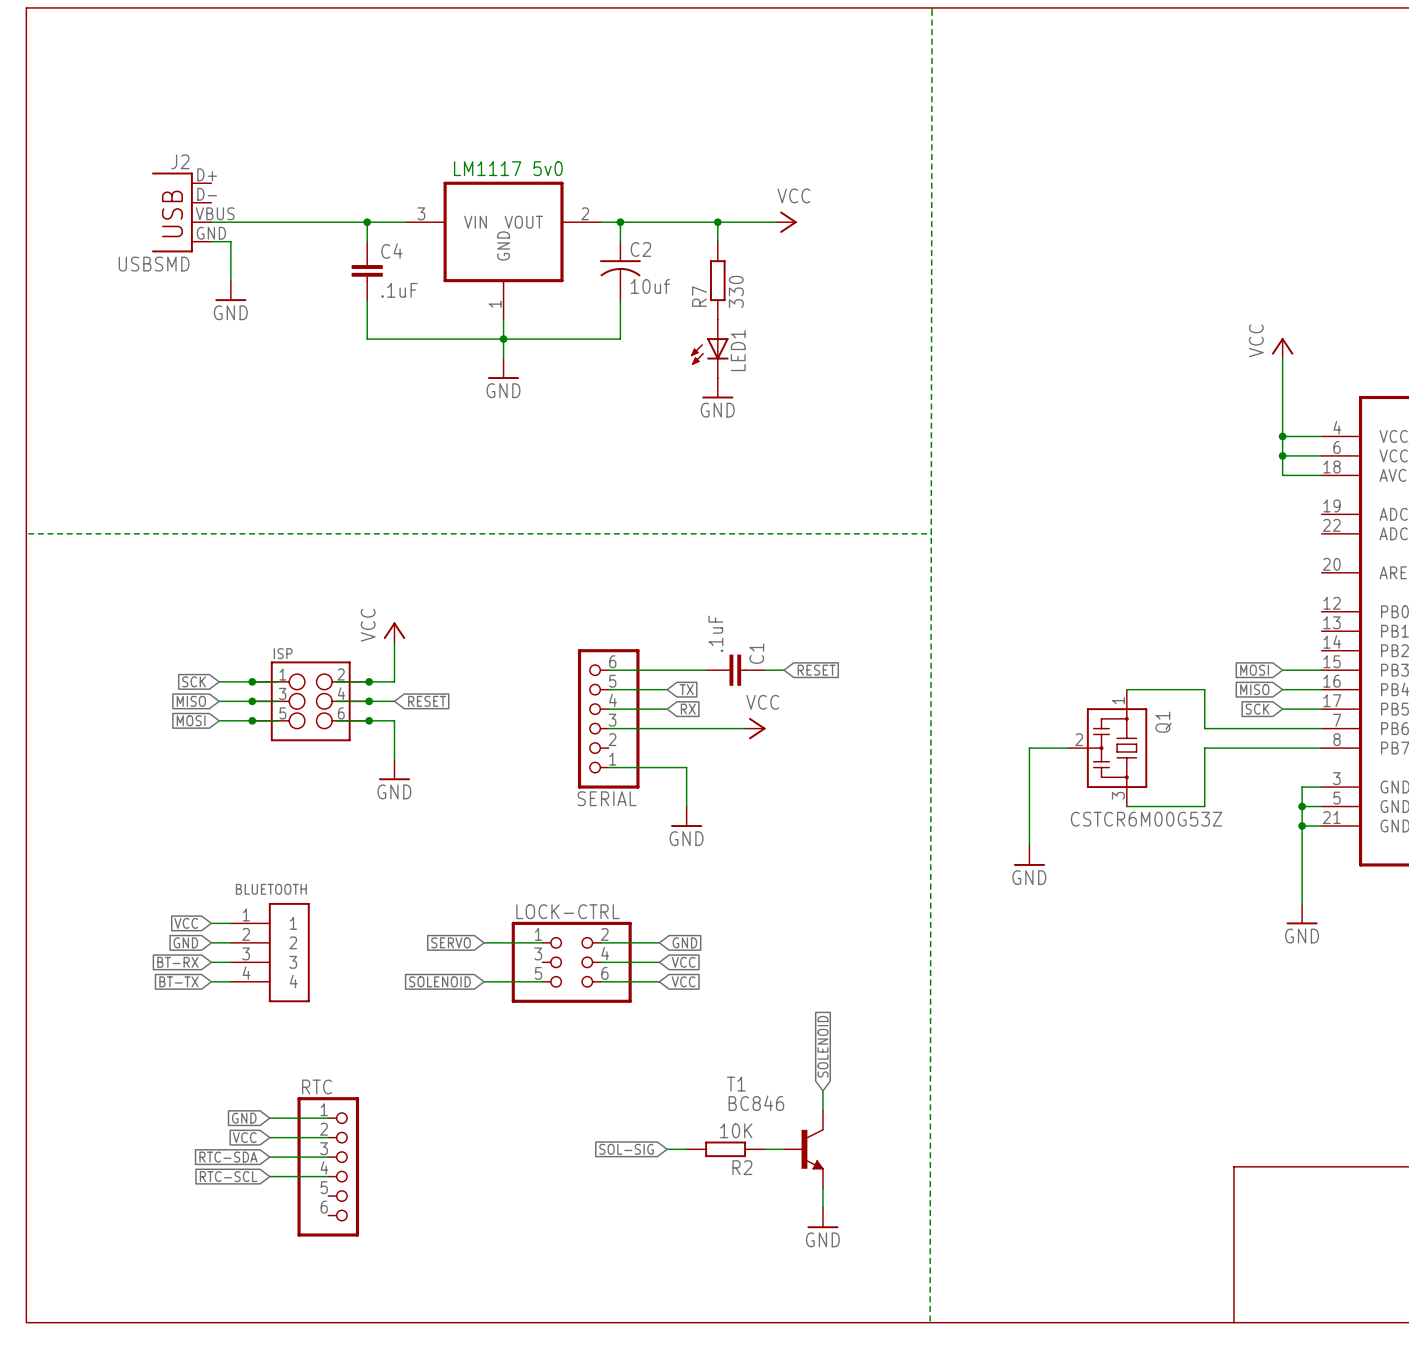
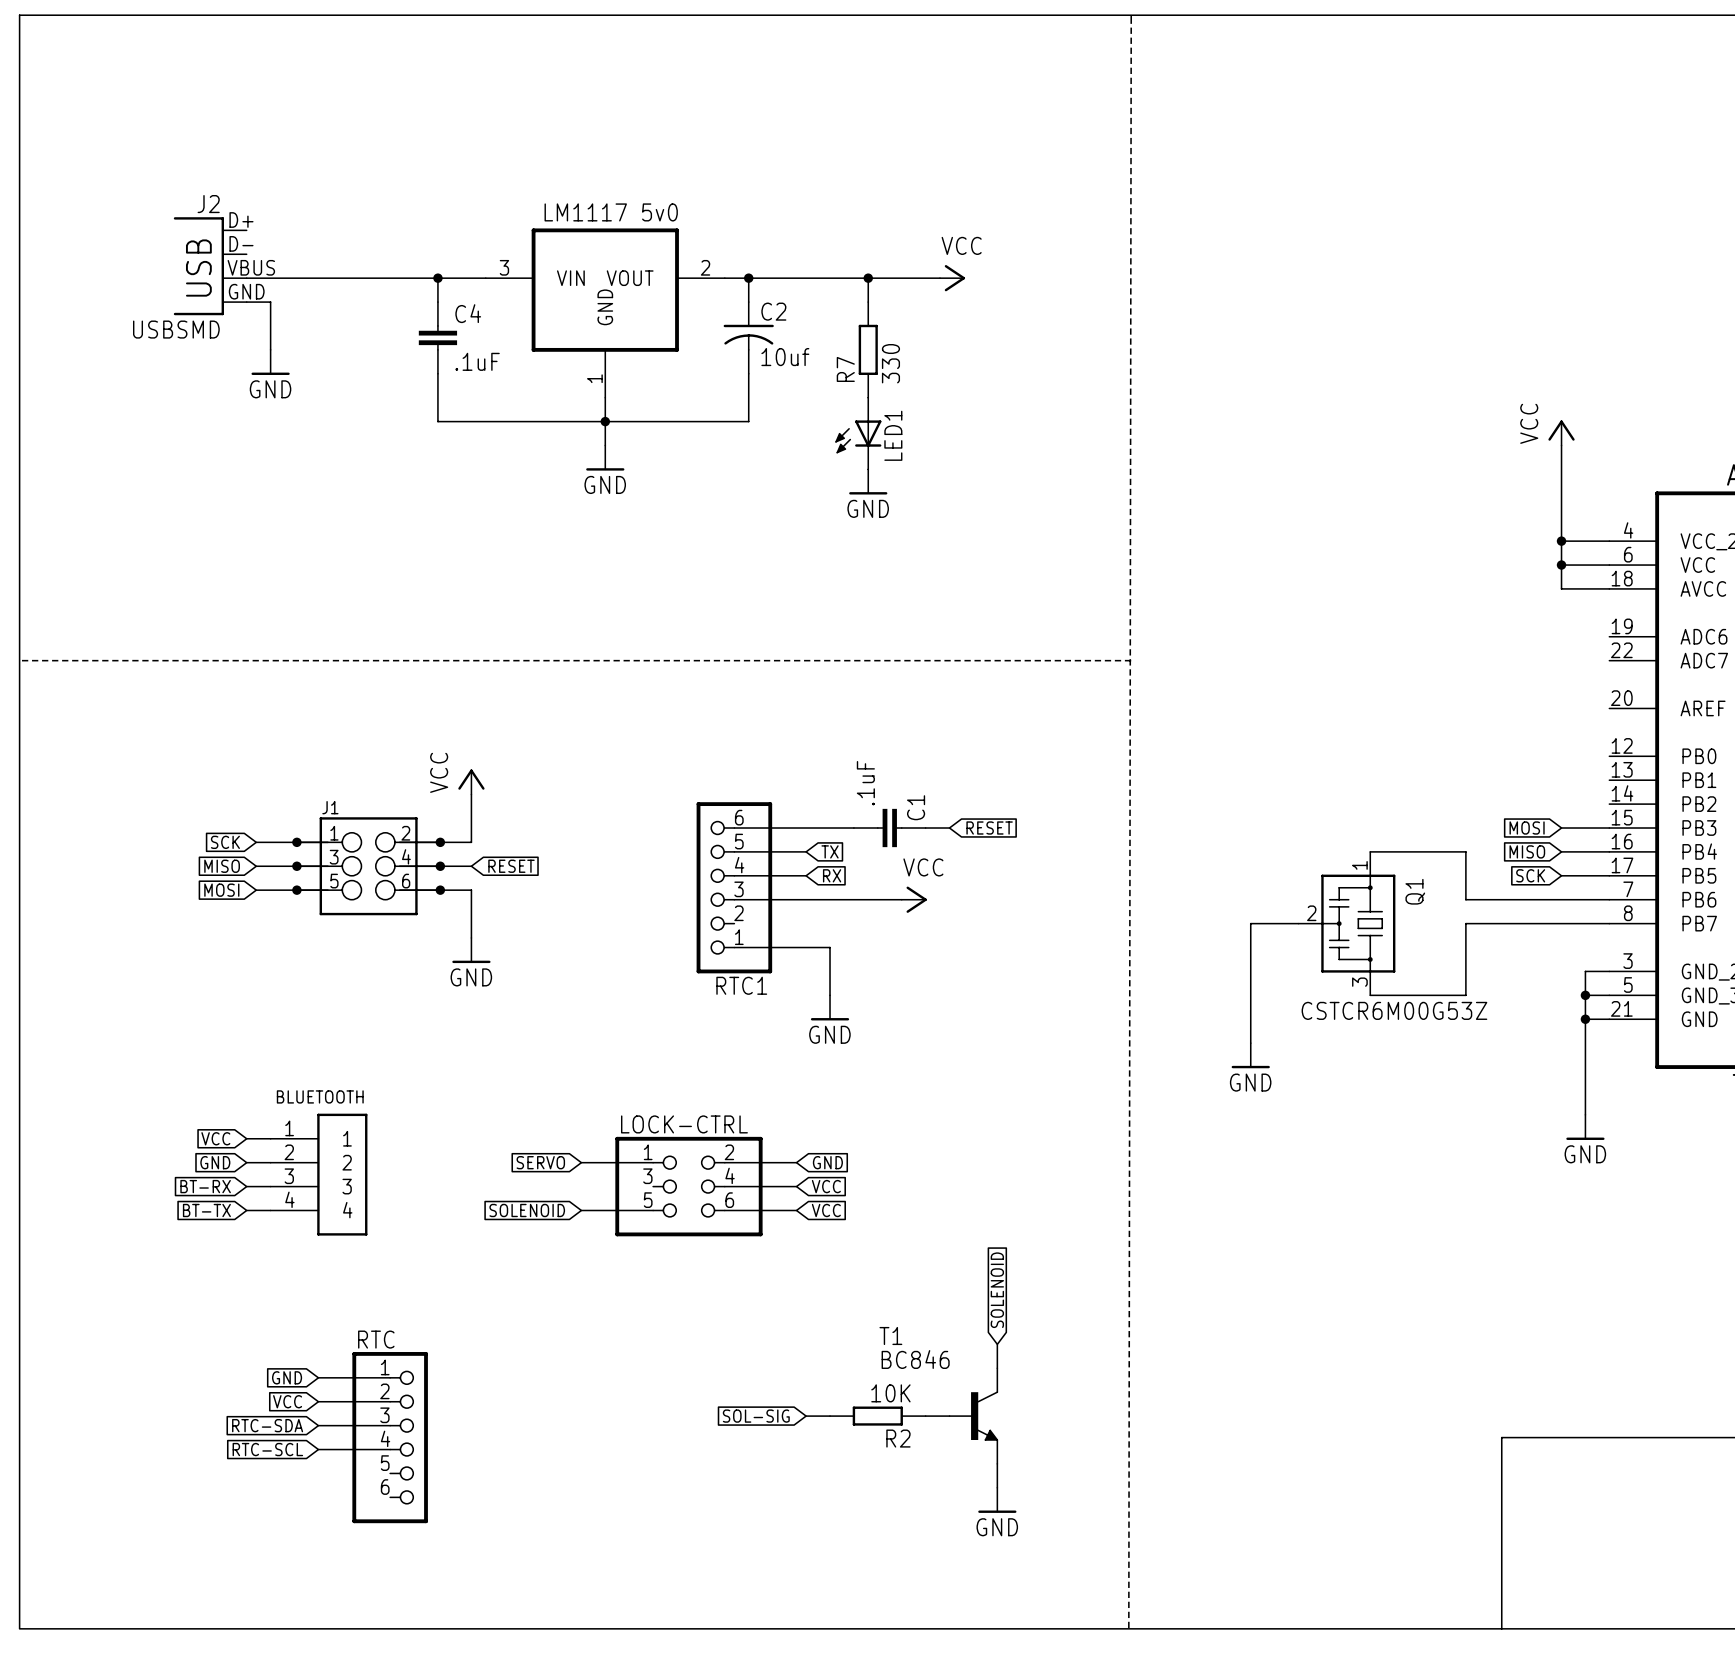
ISP name: ISP (283, 653) -> J1 (330, 807)
SERIAL name: SERIAL (607, 798) -> RTC1 (741, 985)

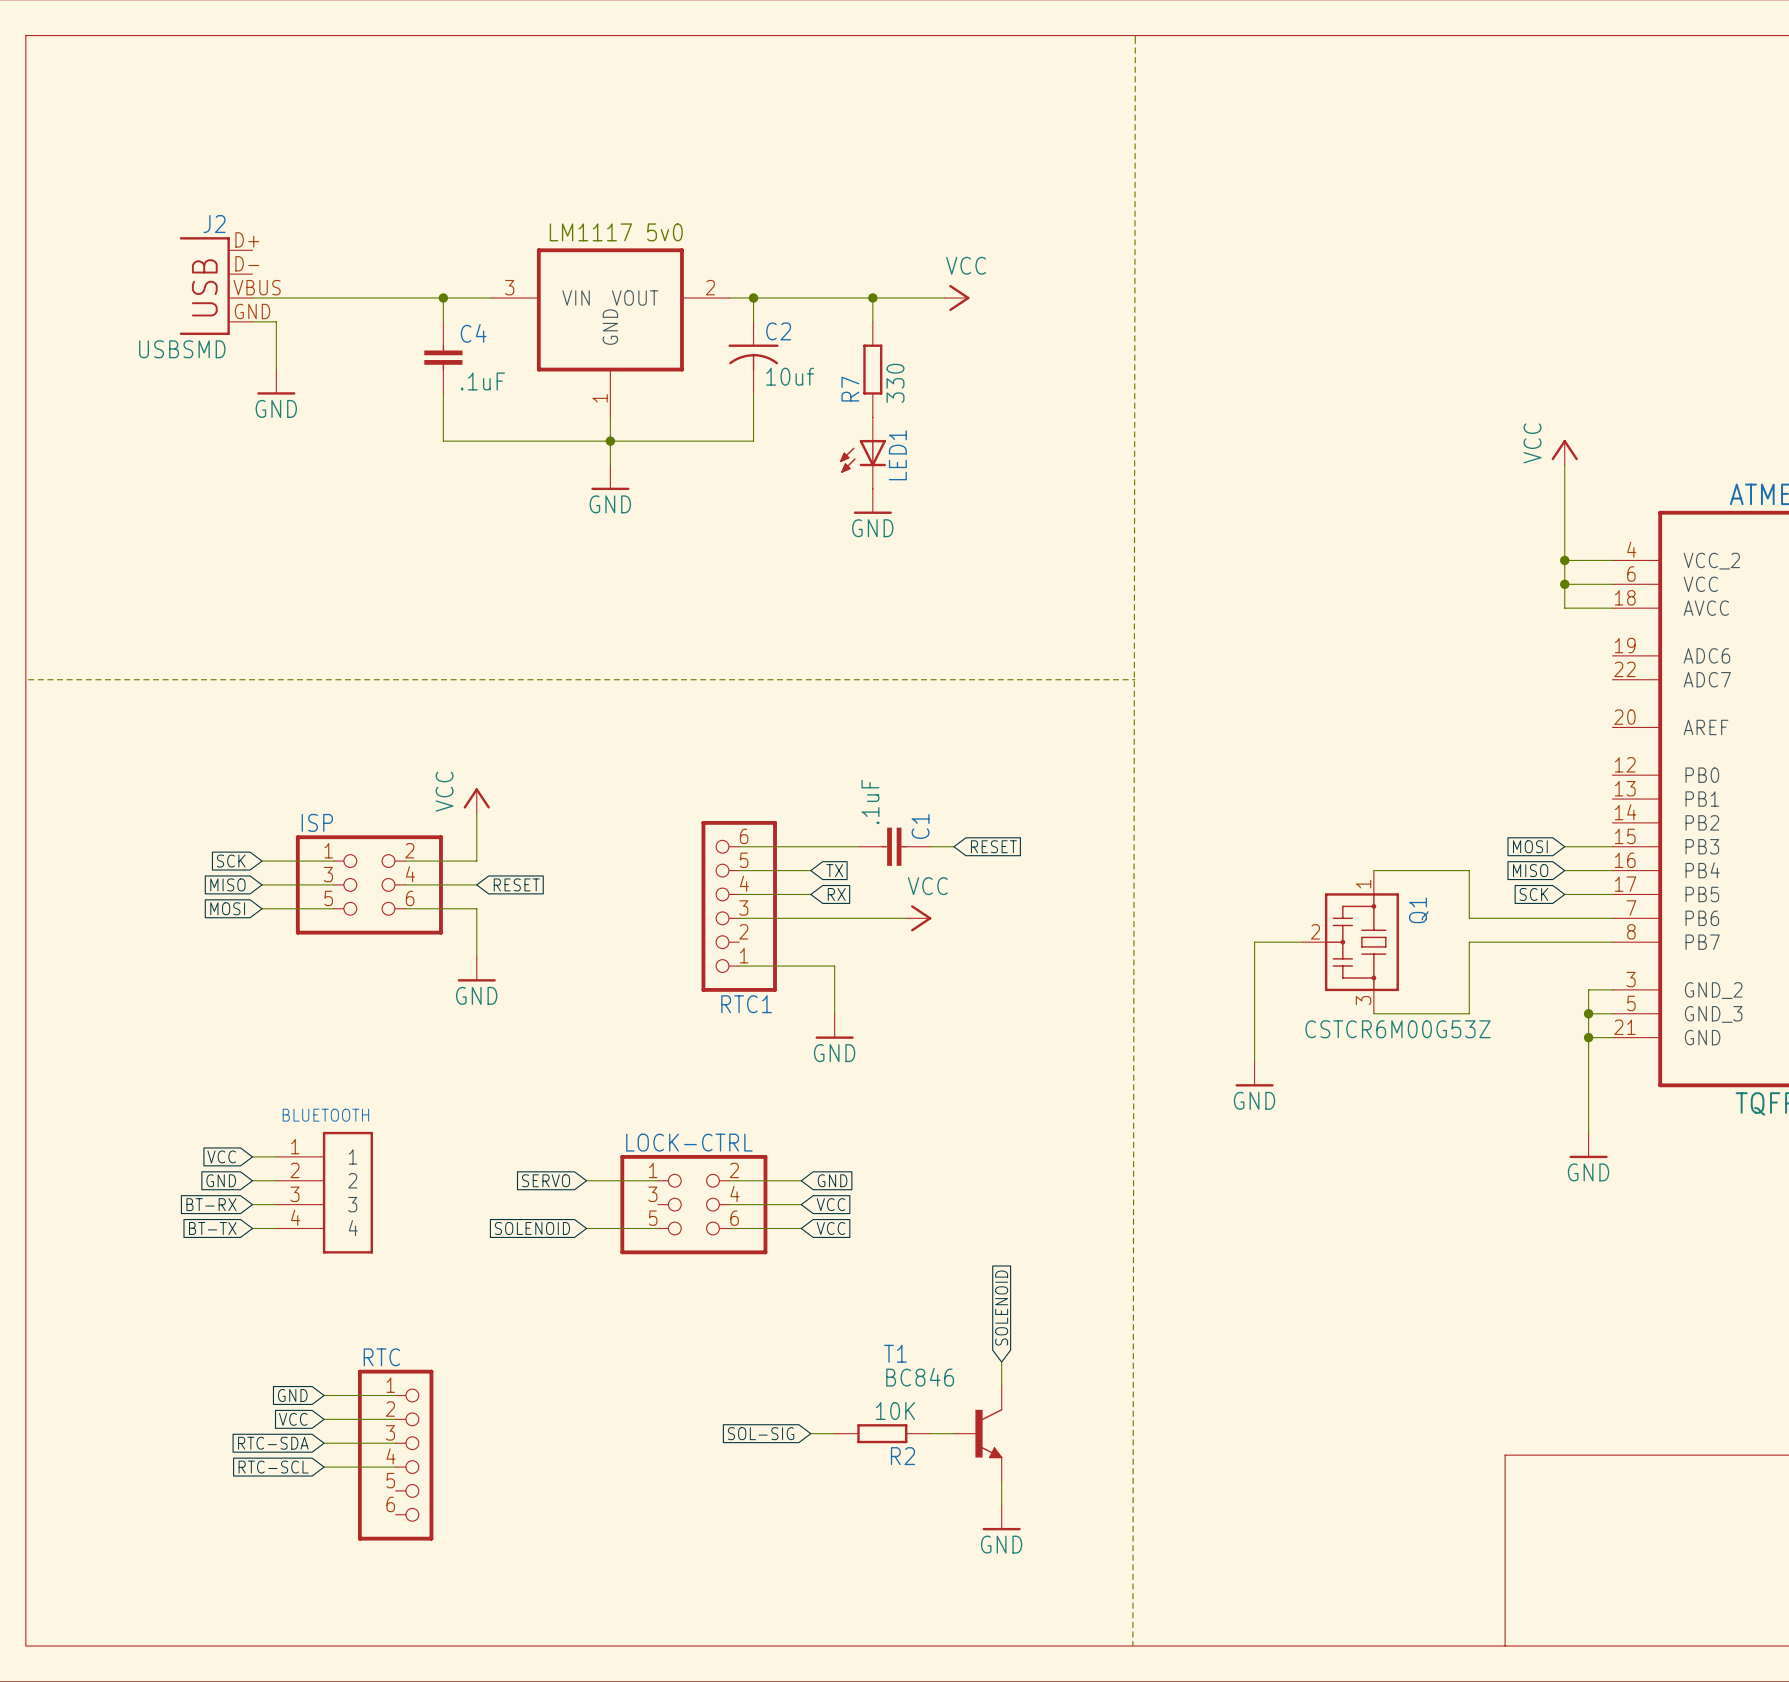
junction: (296, 842) -> none
junction: (440, 842) -> none
junction: (296, 866) -> none
ISP: none -> (369, 884)
J1: (368, 866) -> none
junction: (440, 866) -> none
junction: (296, 890) -> none
junction: (440, 890) -> none

